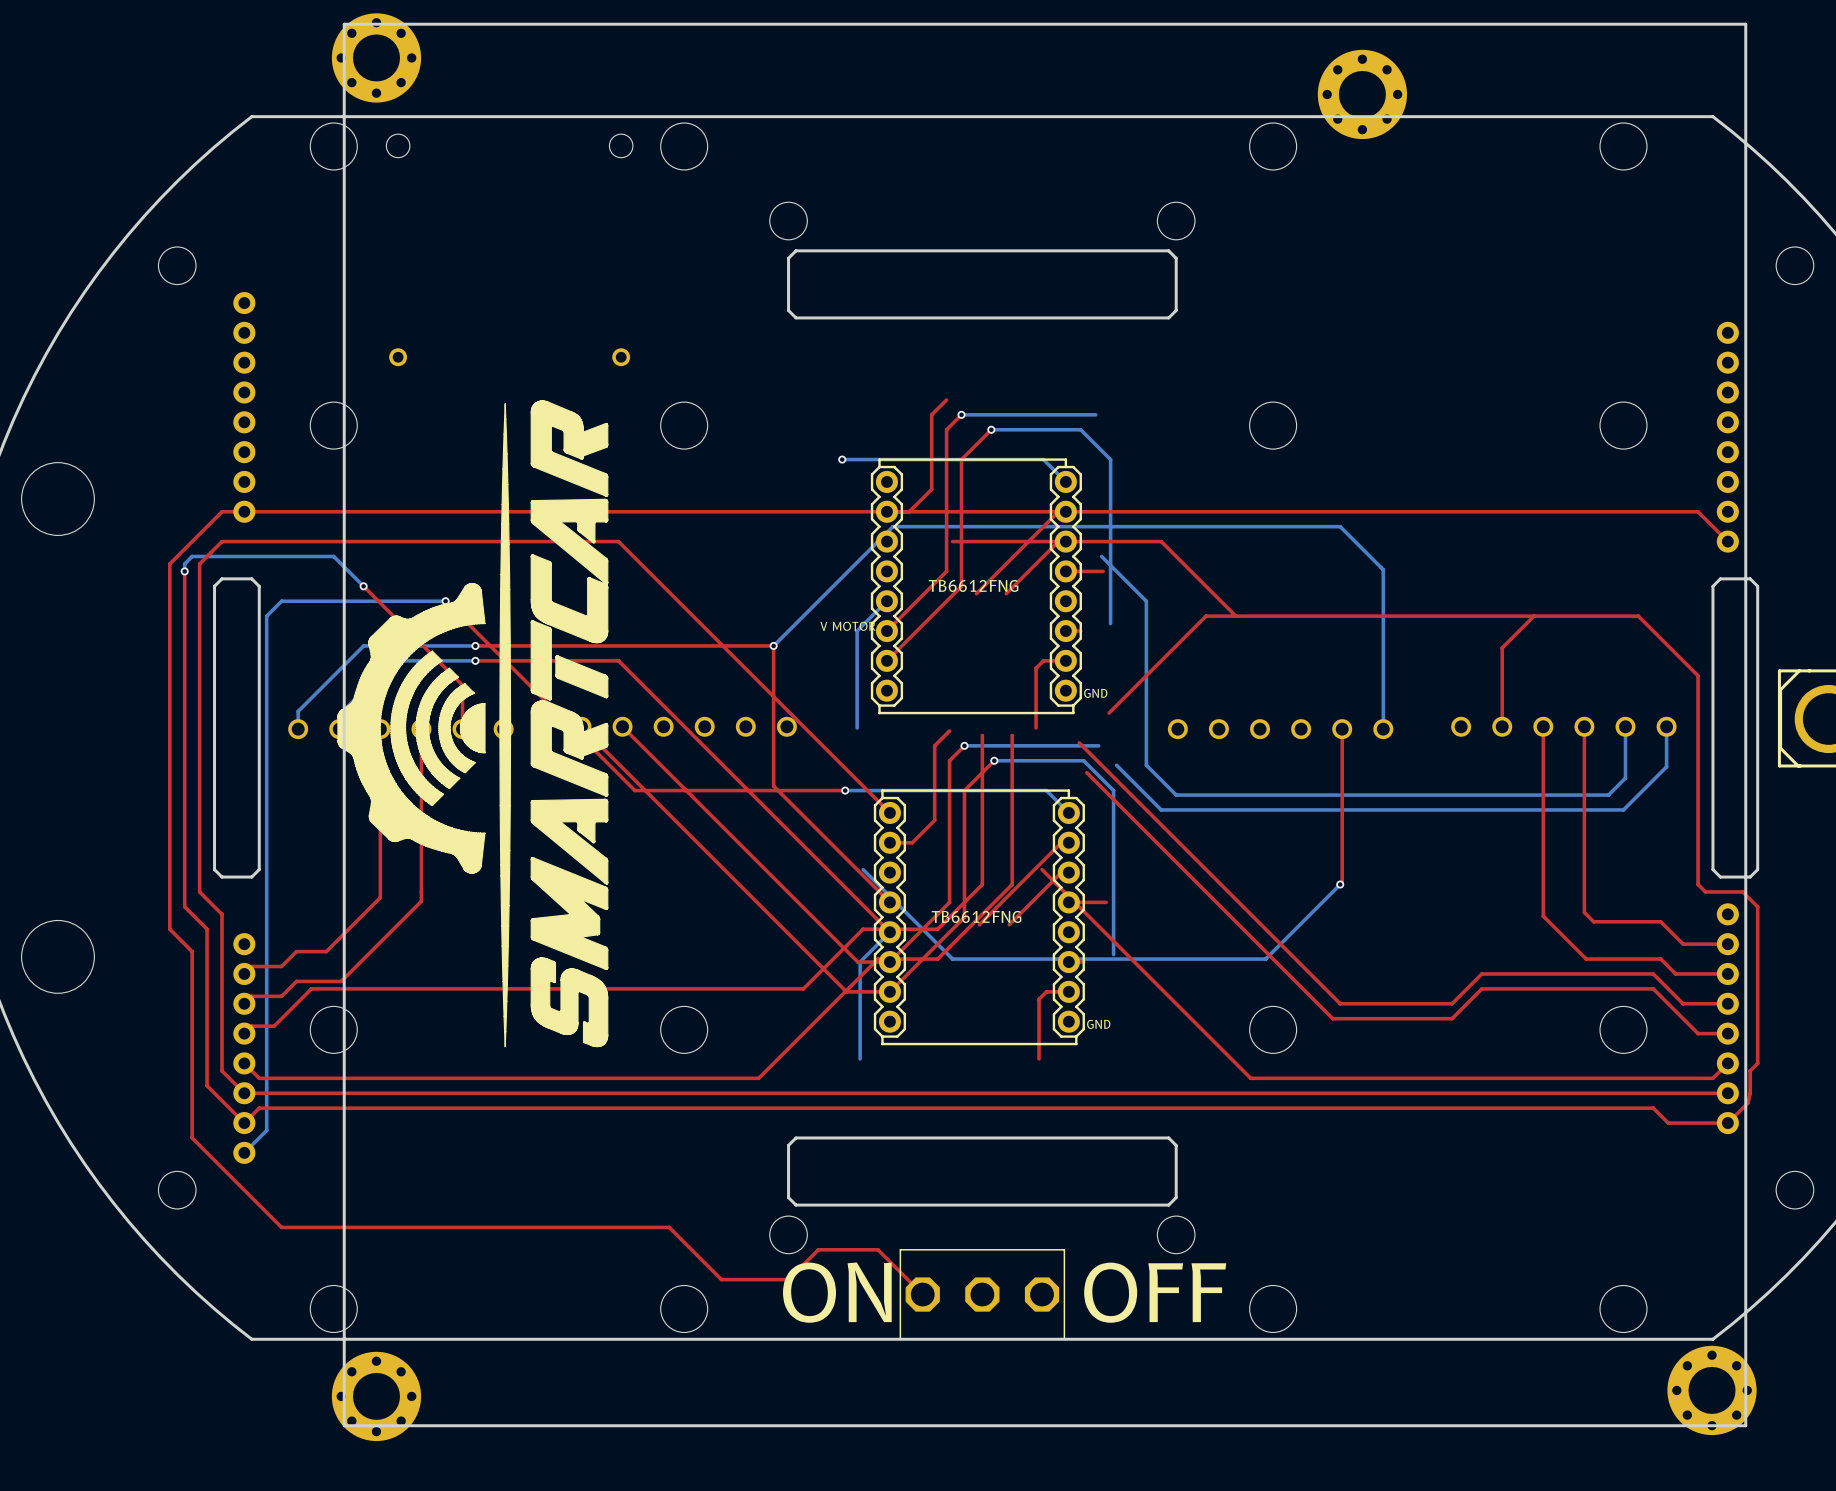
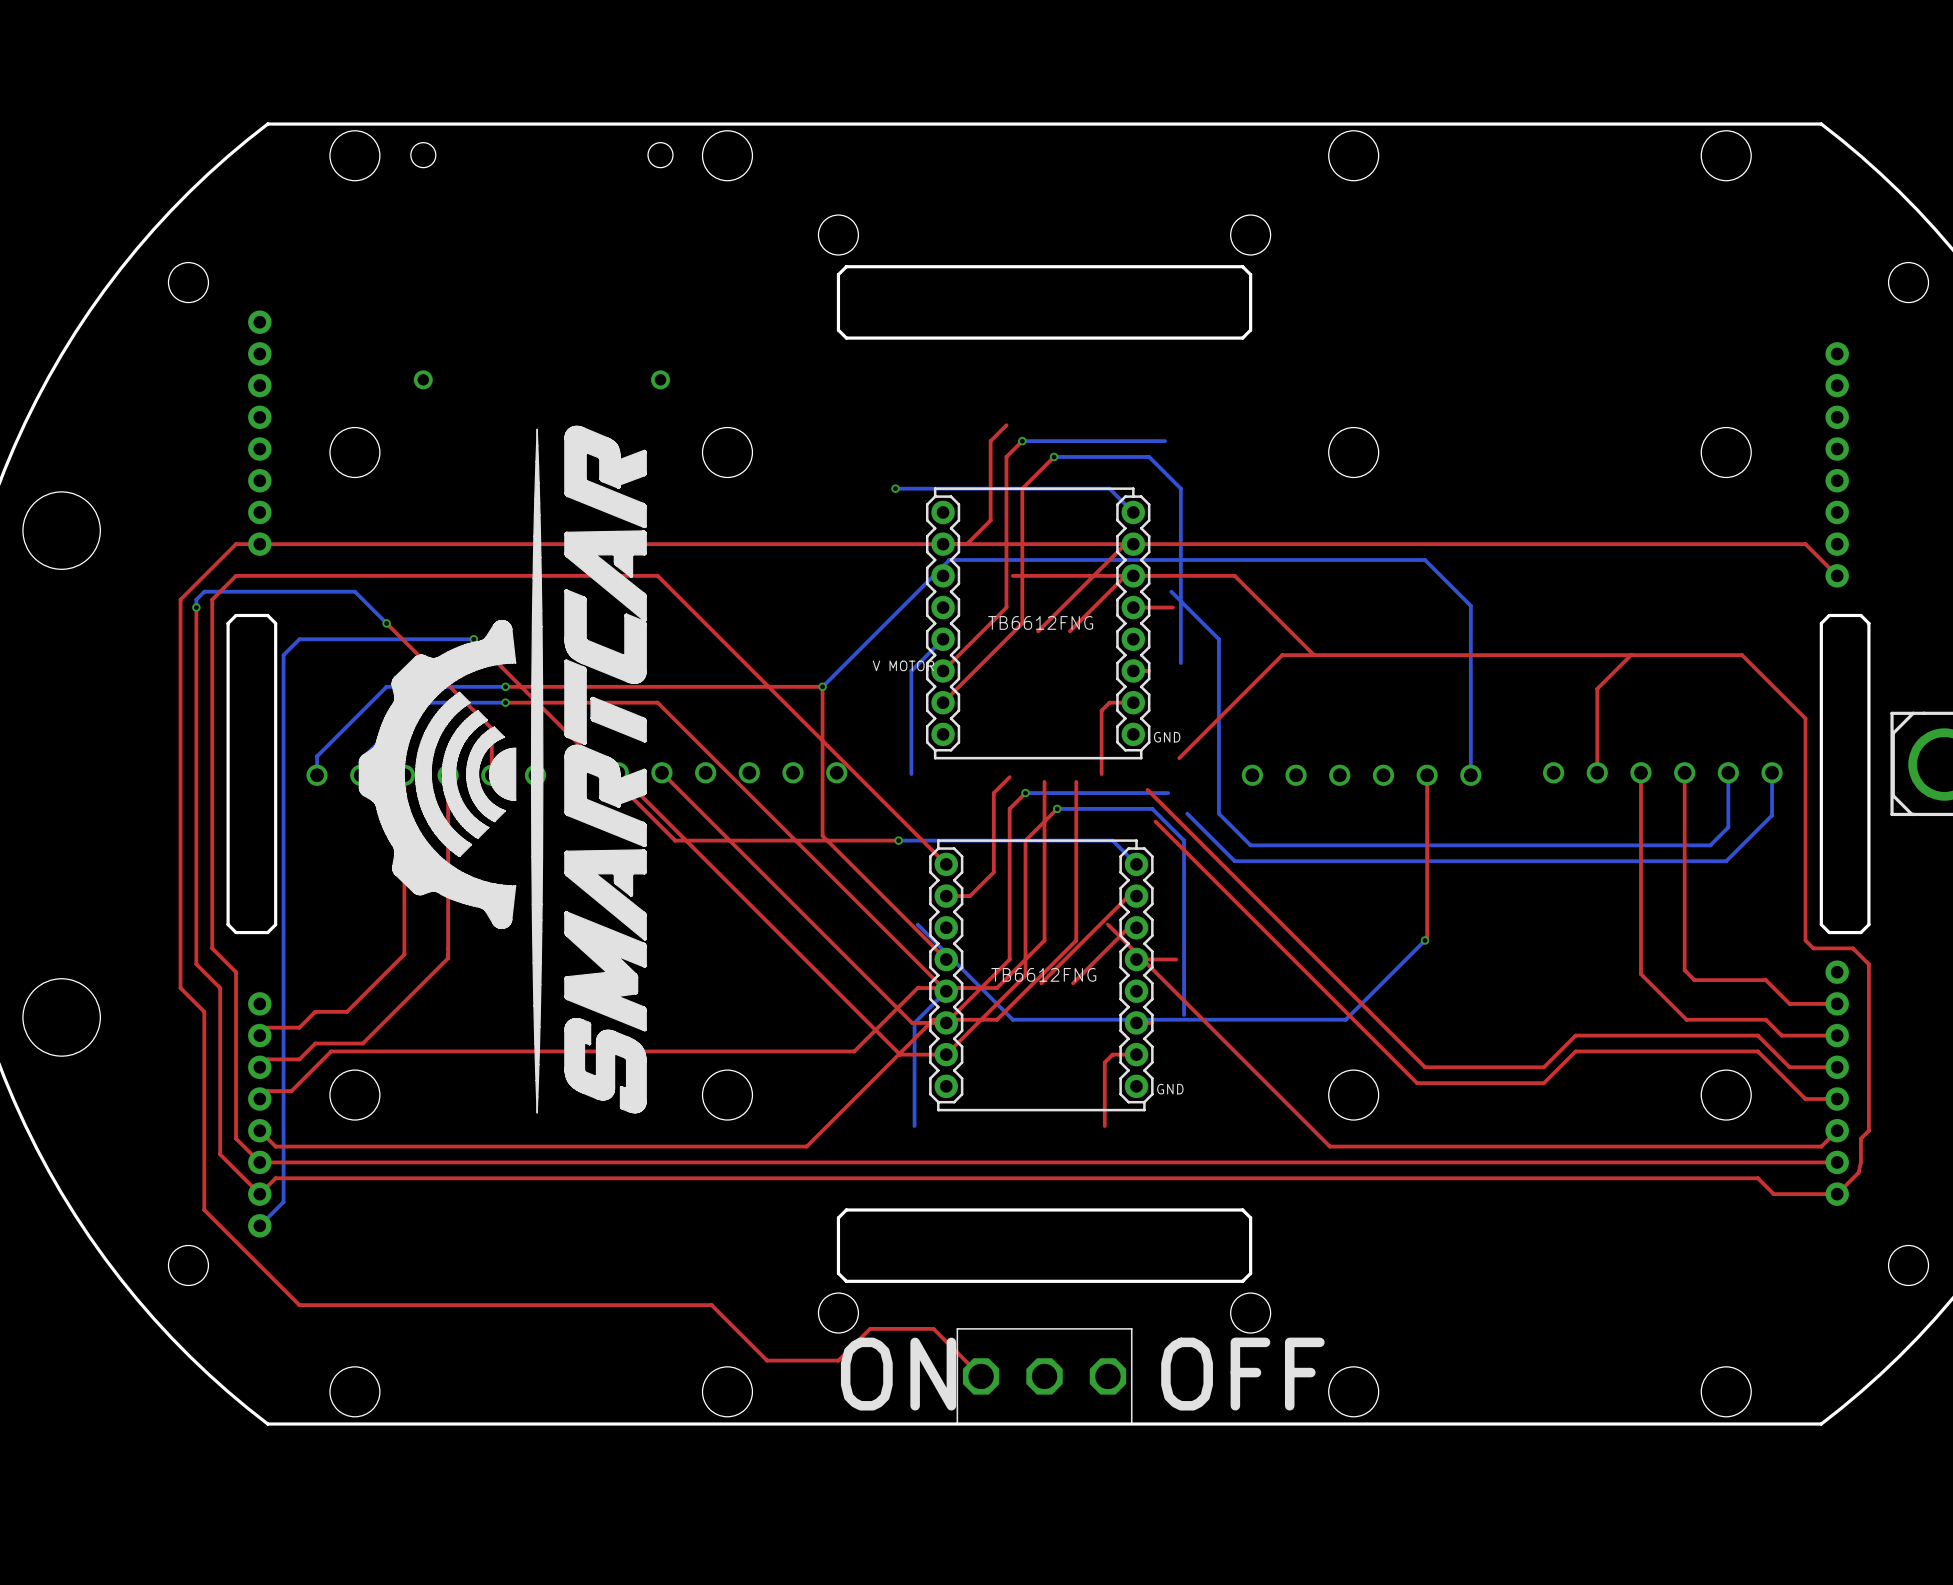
part: (1044, 727) -> none

